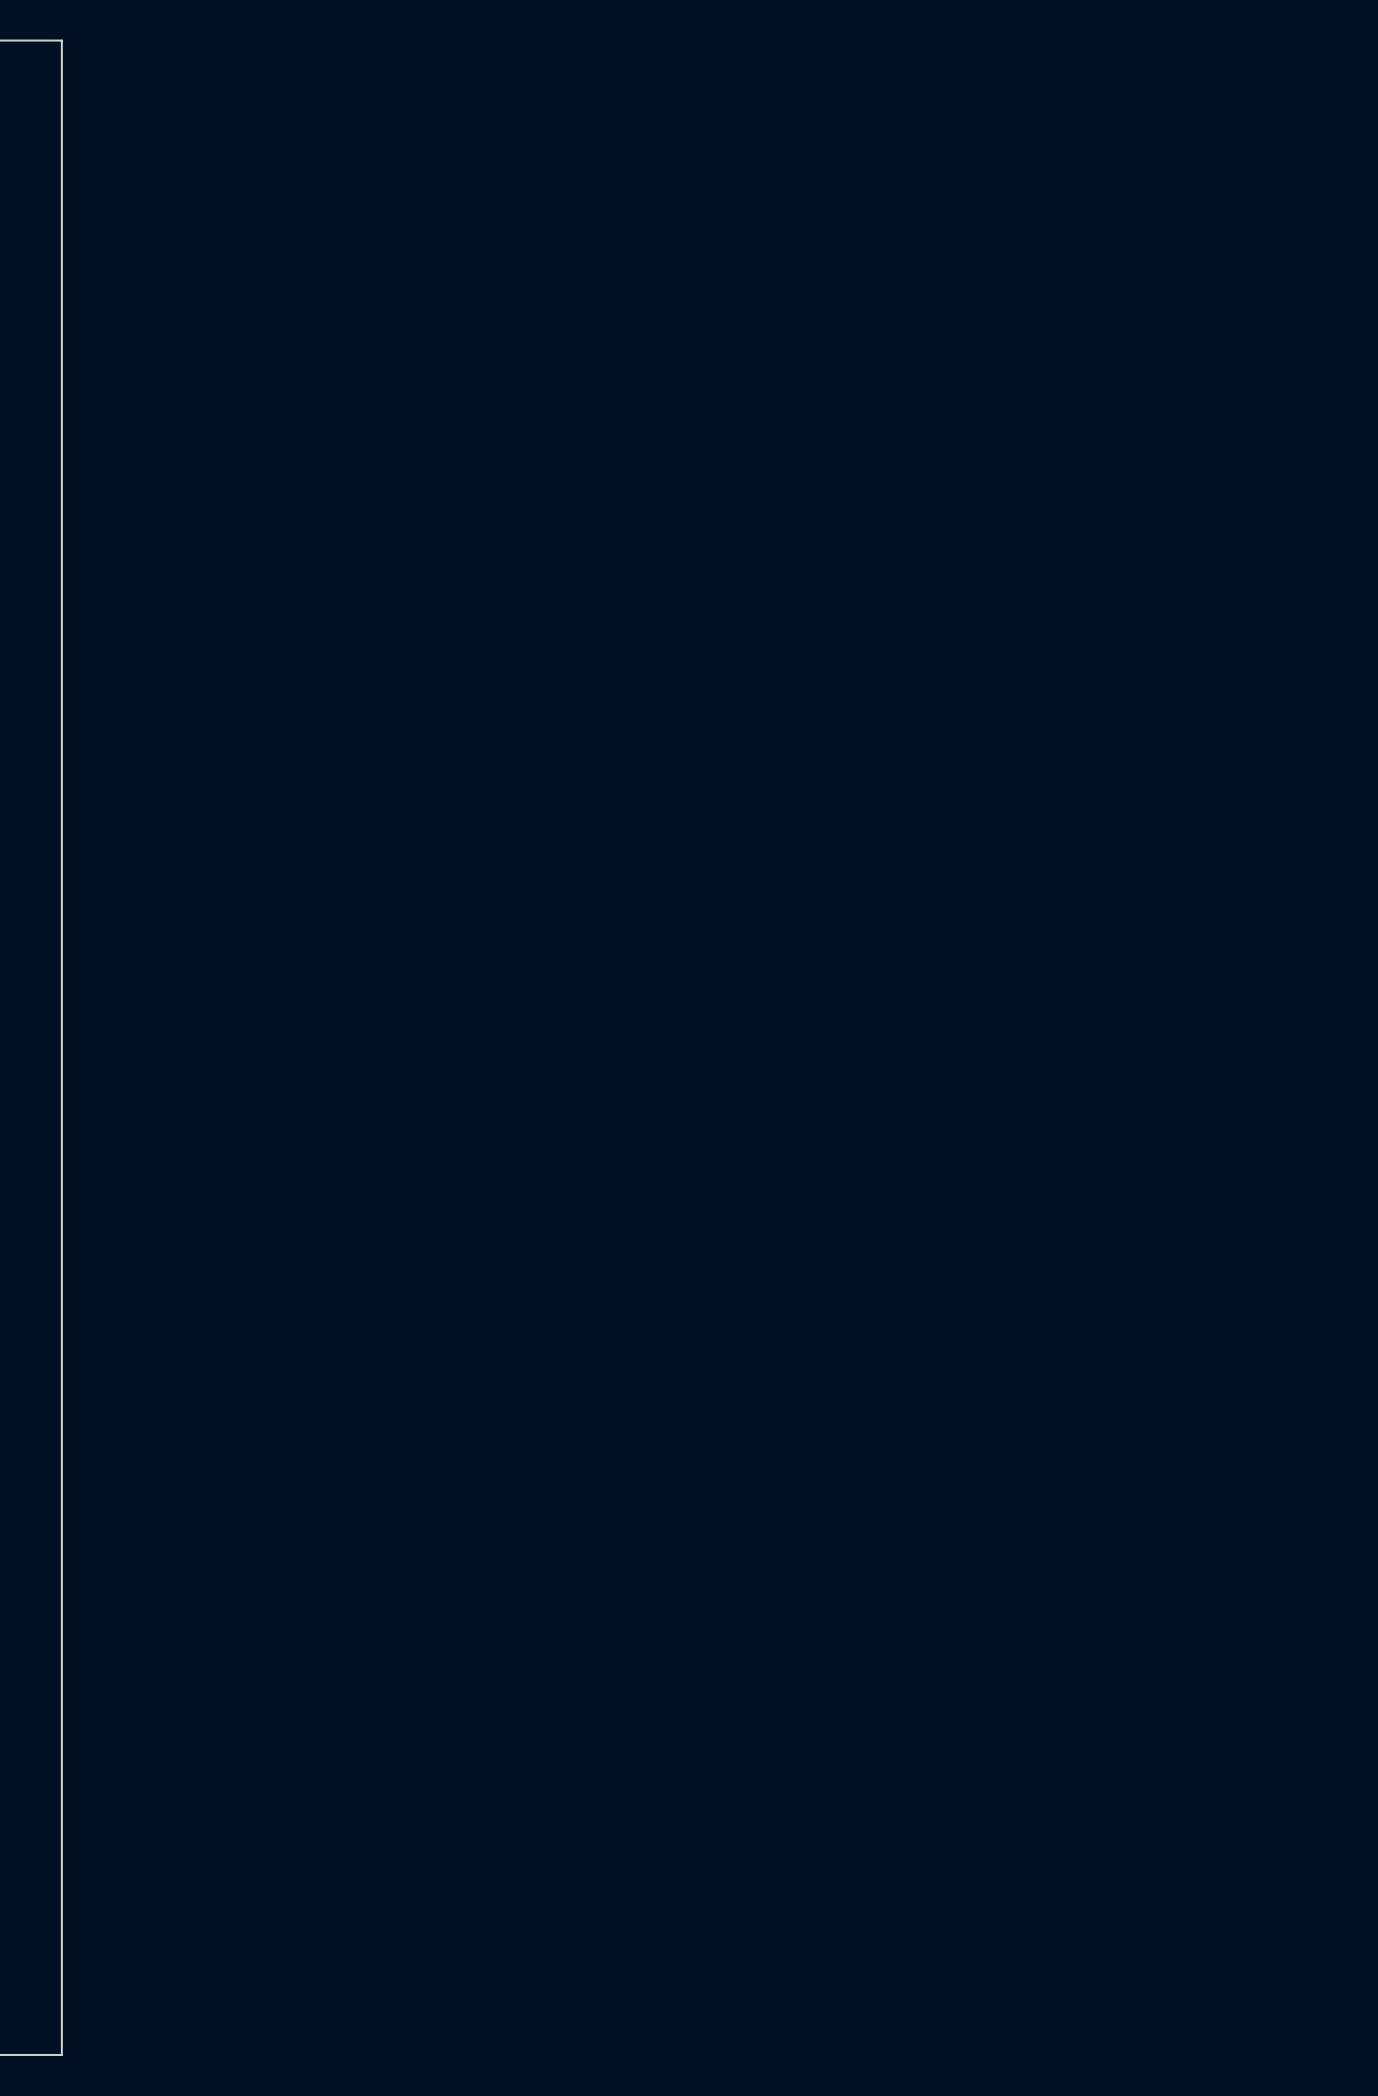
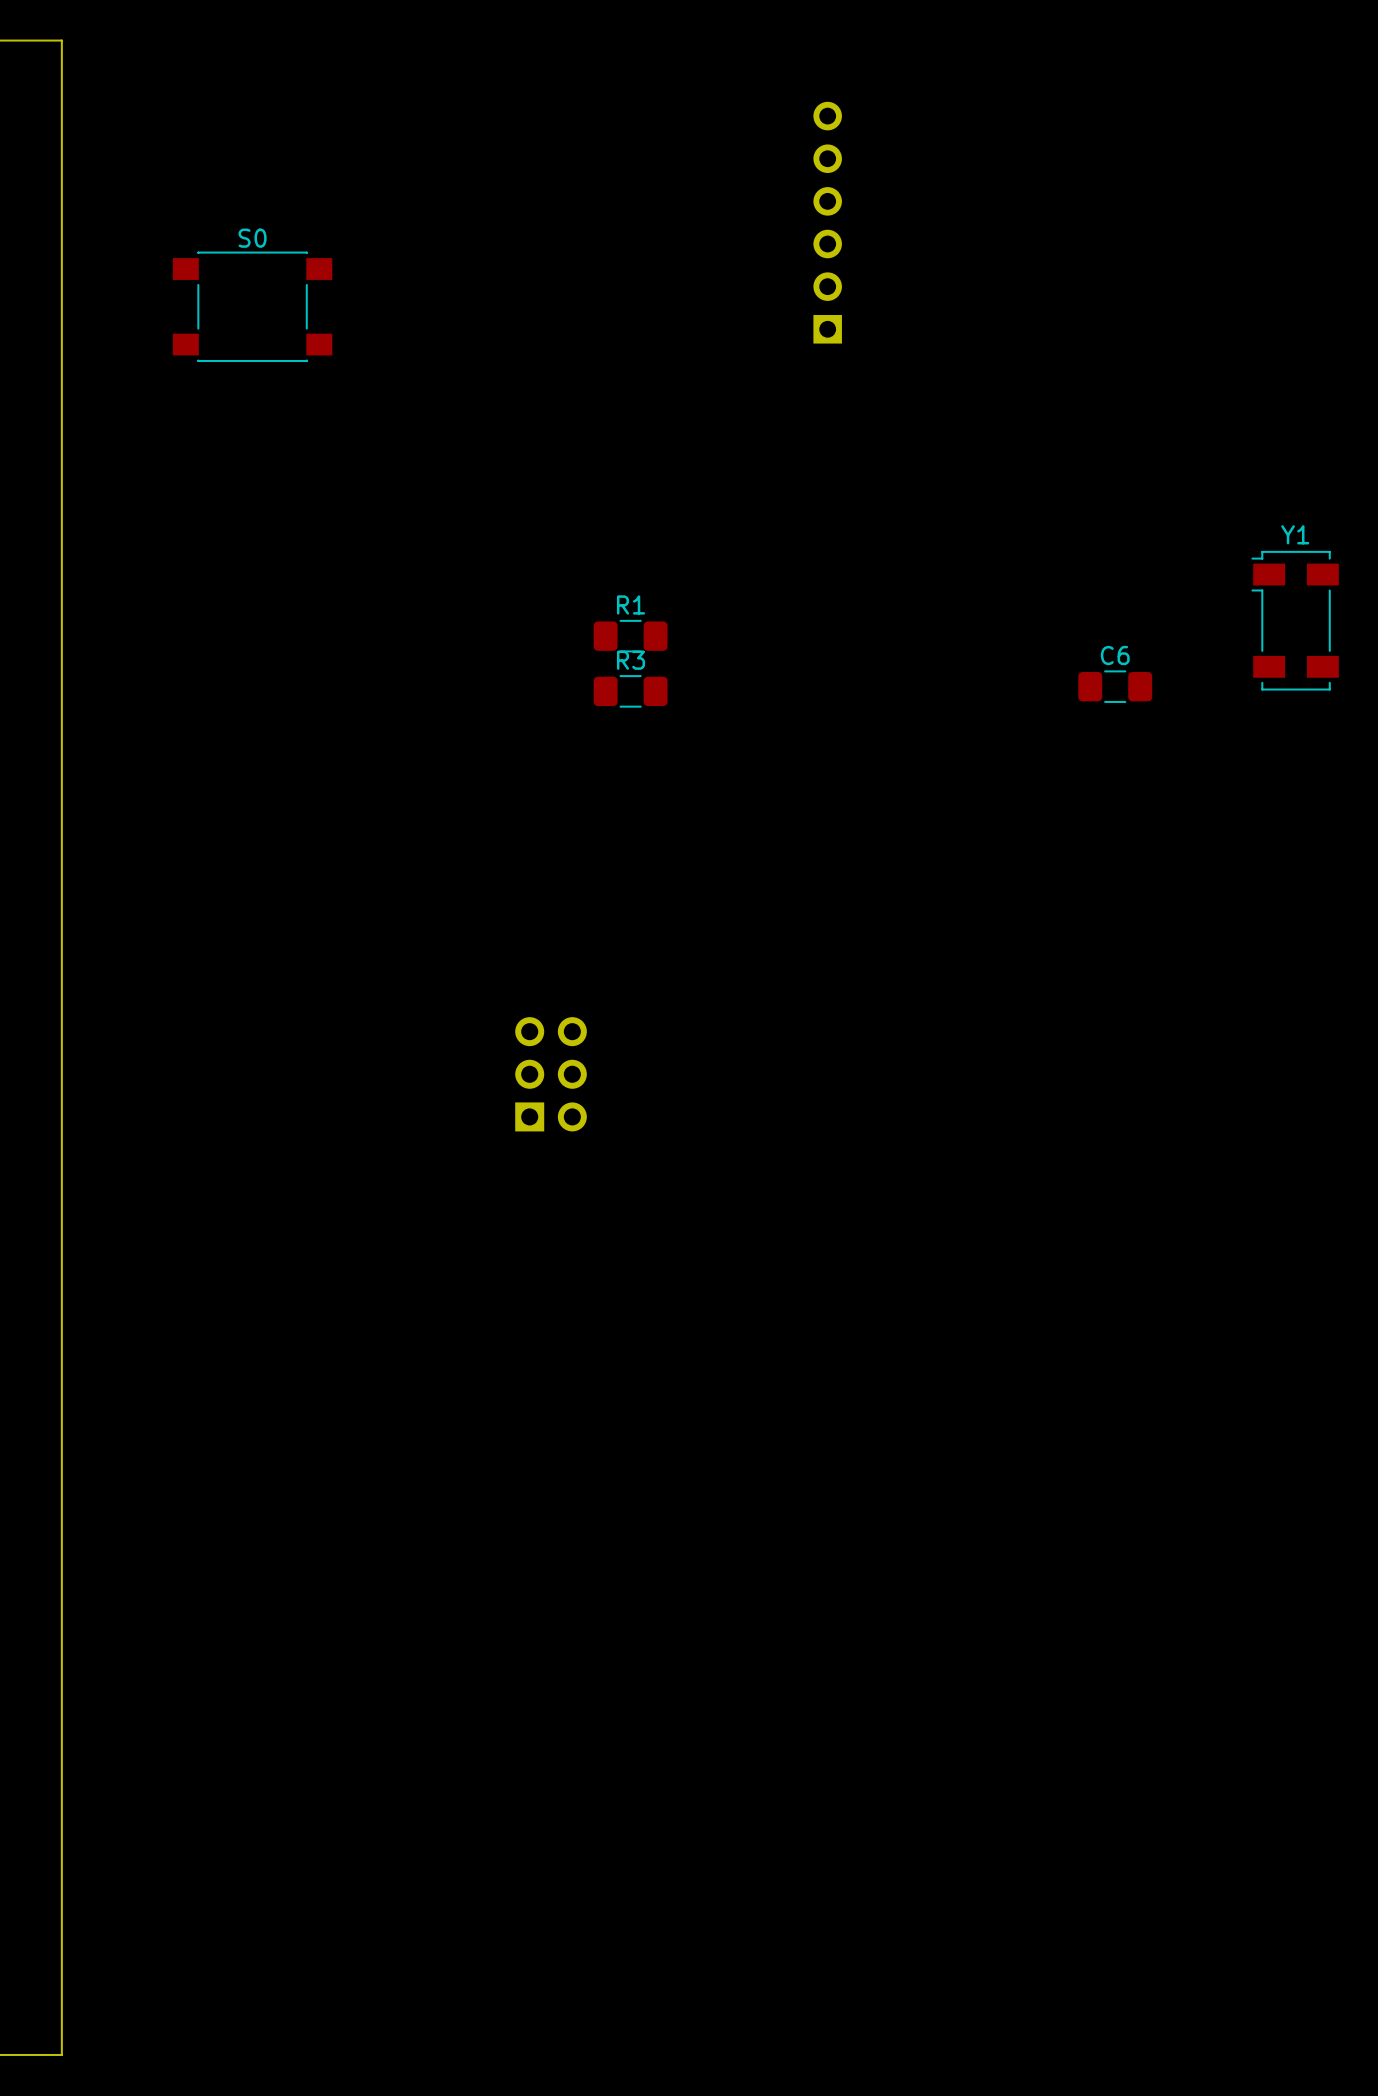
part: none -> (827, 222)
S0: none -> (252, 306)
Y1: none -> (1295, 620)
R1: none -> (630, 636)
C6: none -> (1115, 686)
R3: none -> (630, 691)
part: none -> (551, 1074)

